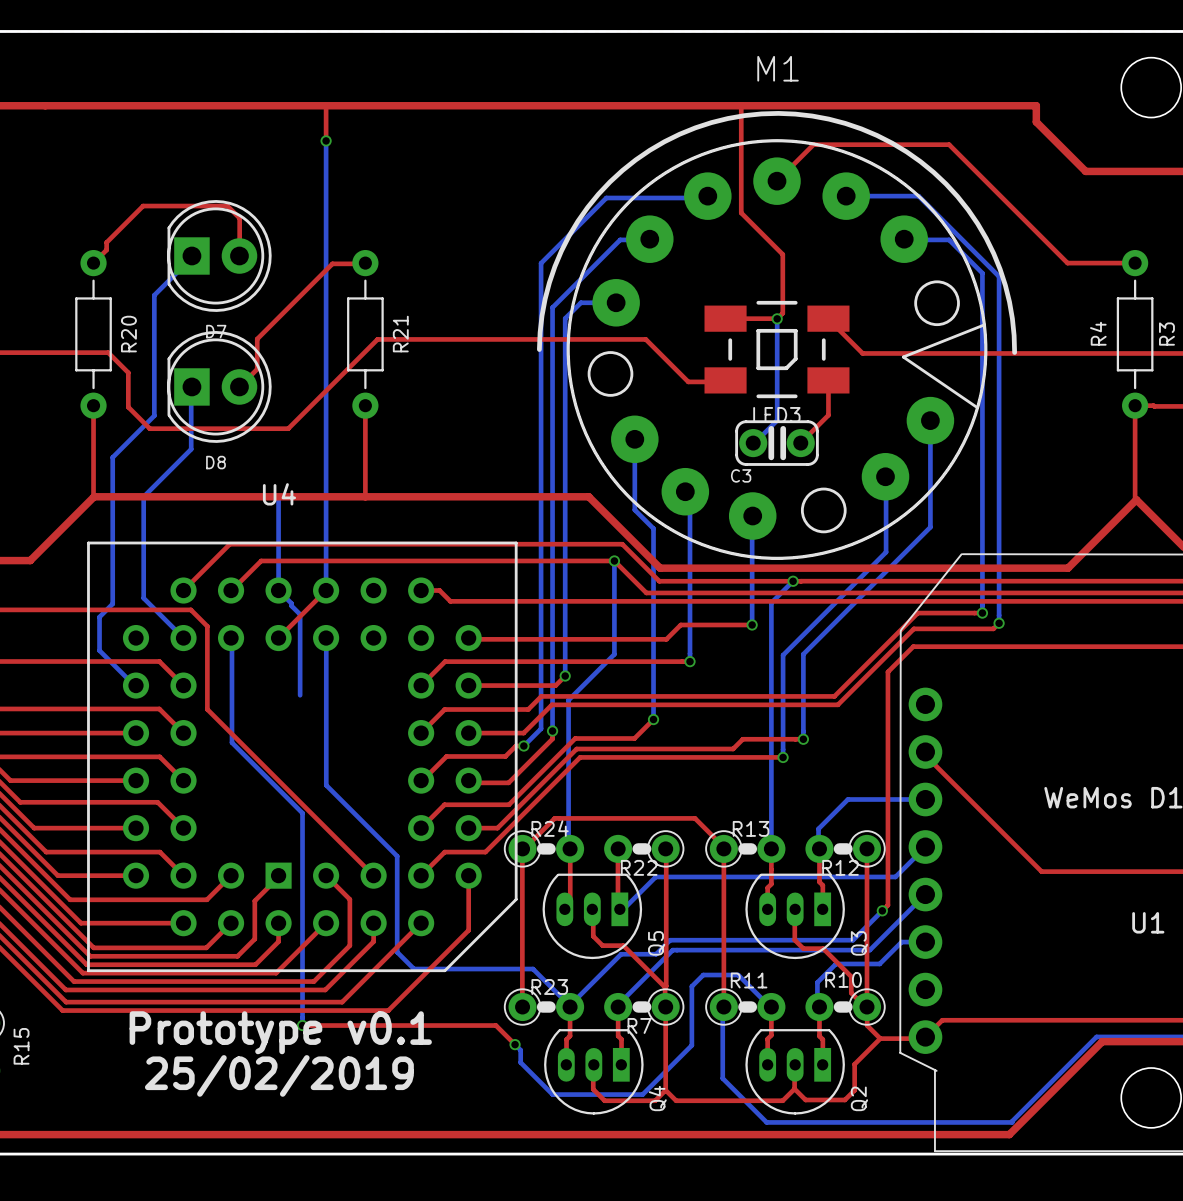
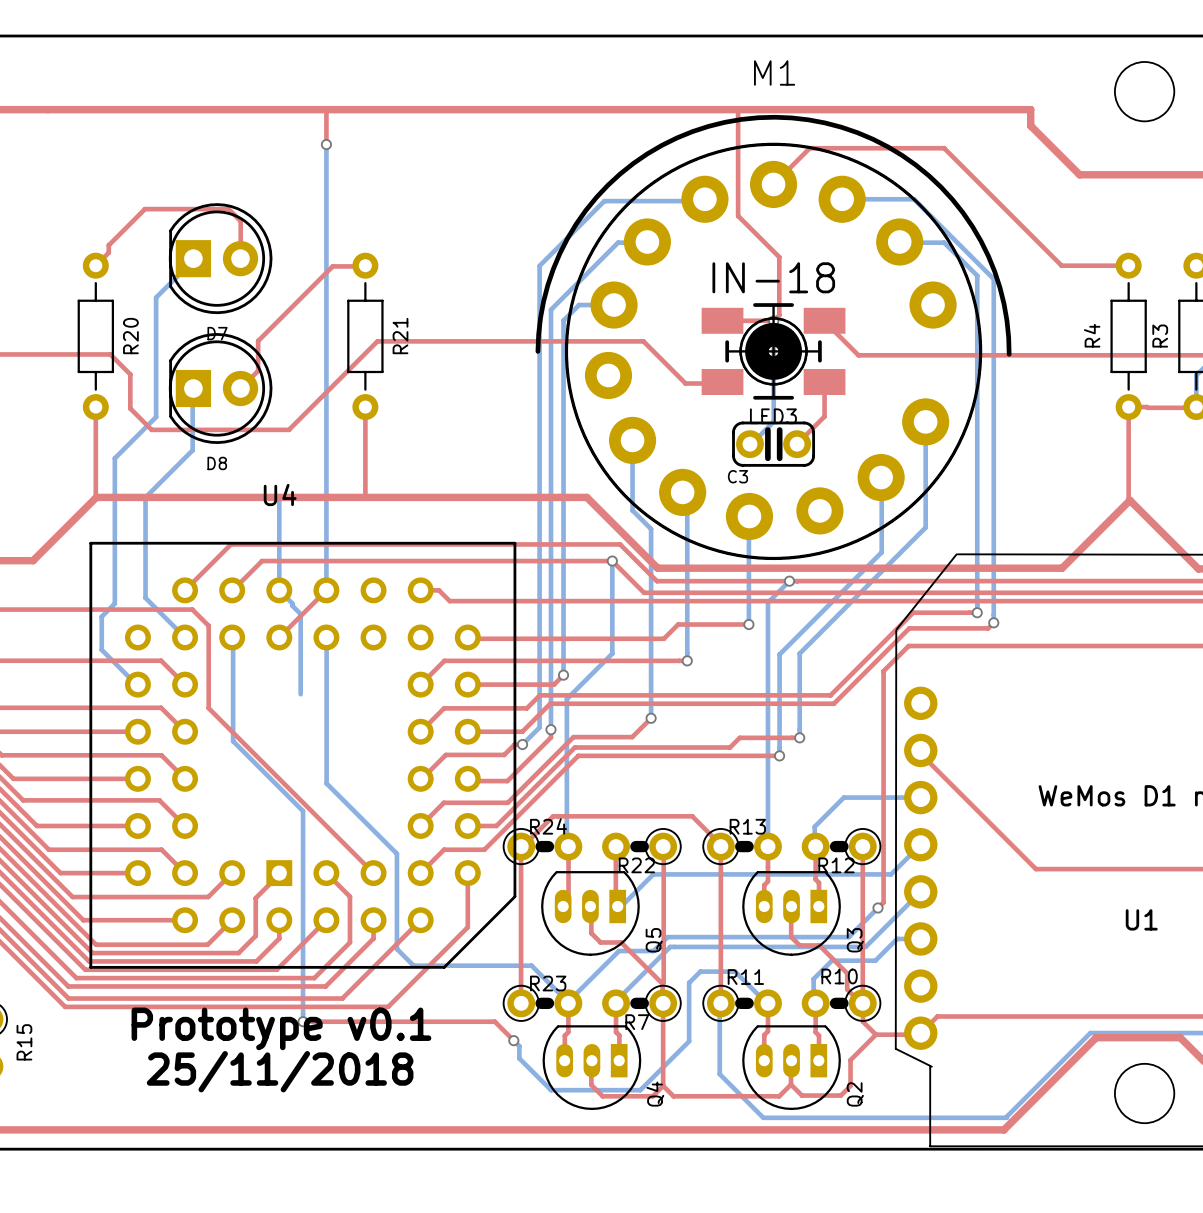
M1 footprint: [537, 111, 1017, 560] -> [535, 114, 1012, 561]
M1 value: none -> IN-18 (773, 277)
text: 25/02/2019 (279, 1075) -> 25/11/2018 (280, 1071)

